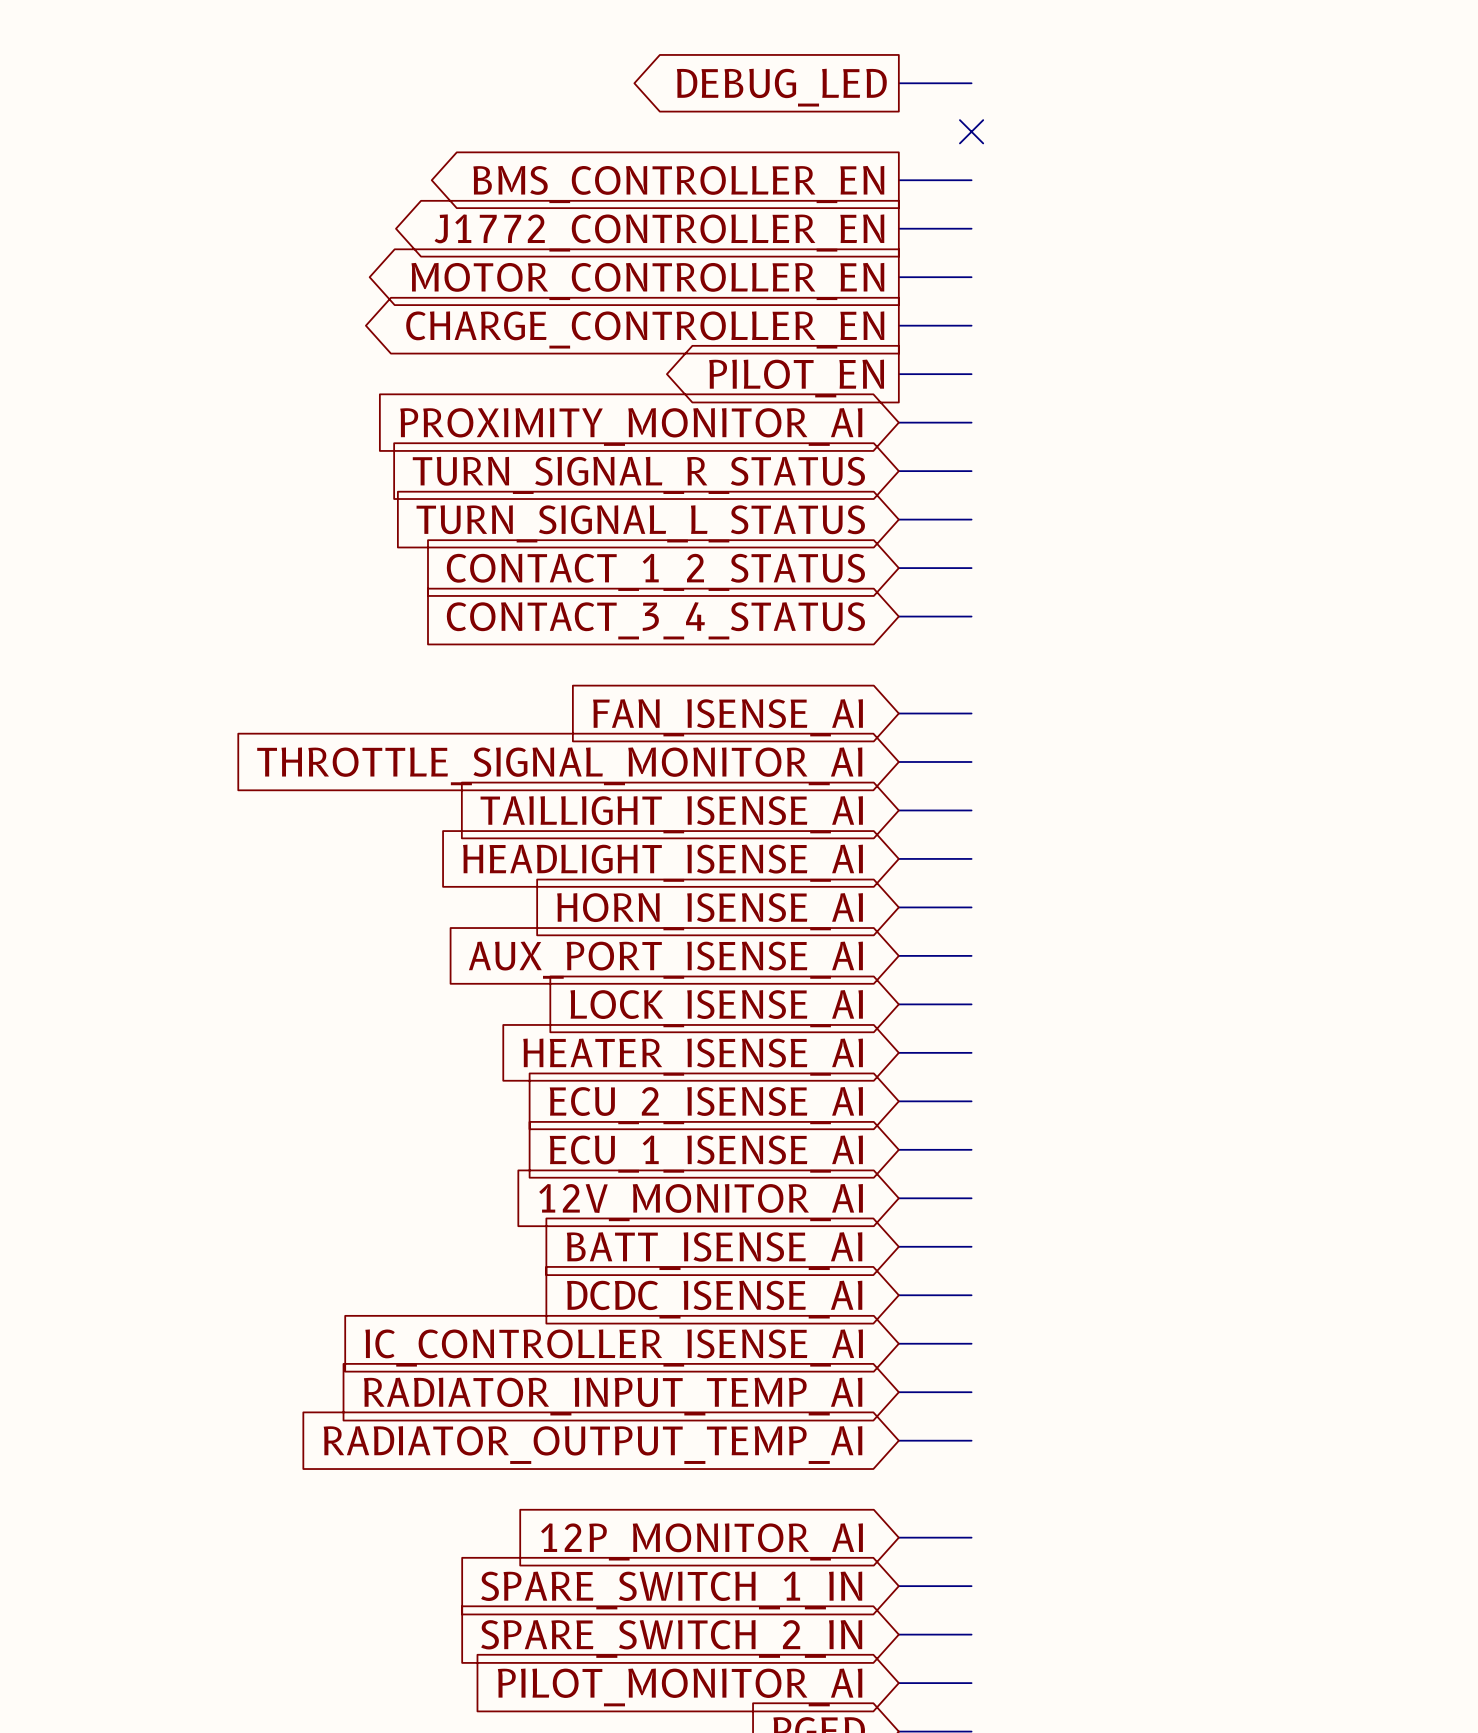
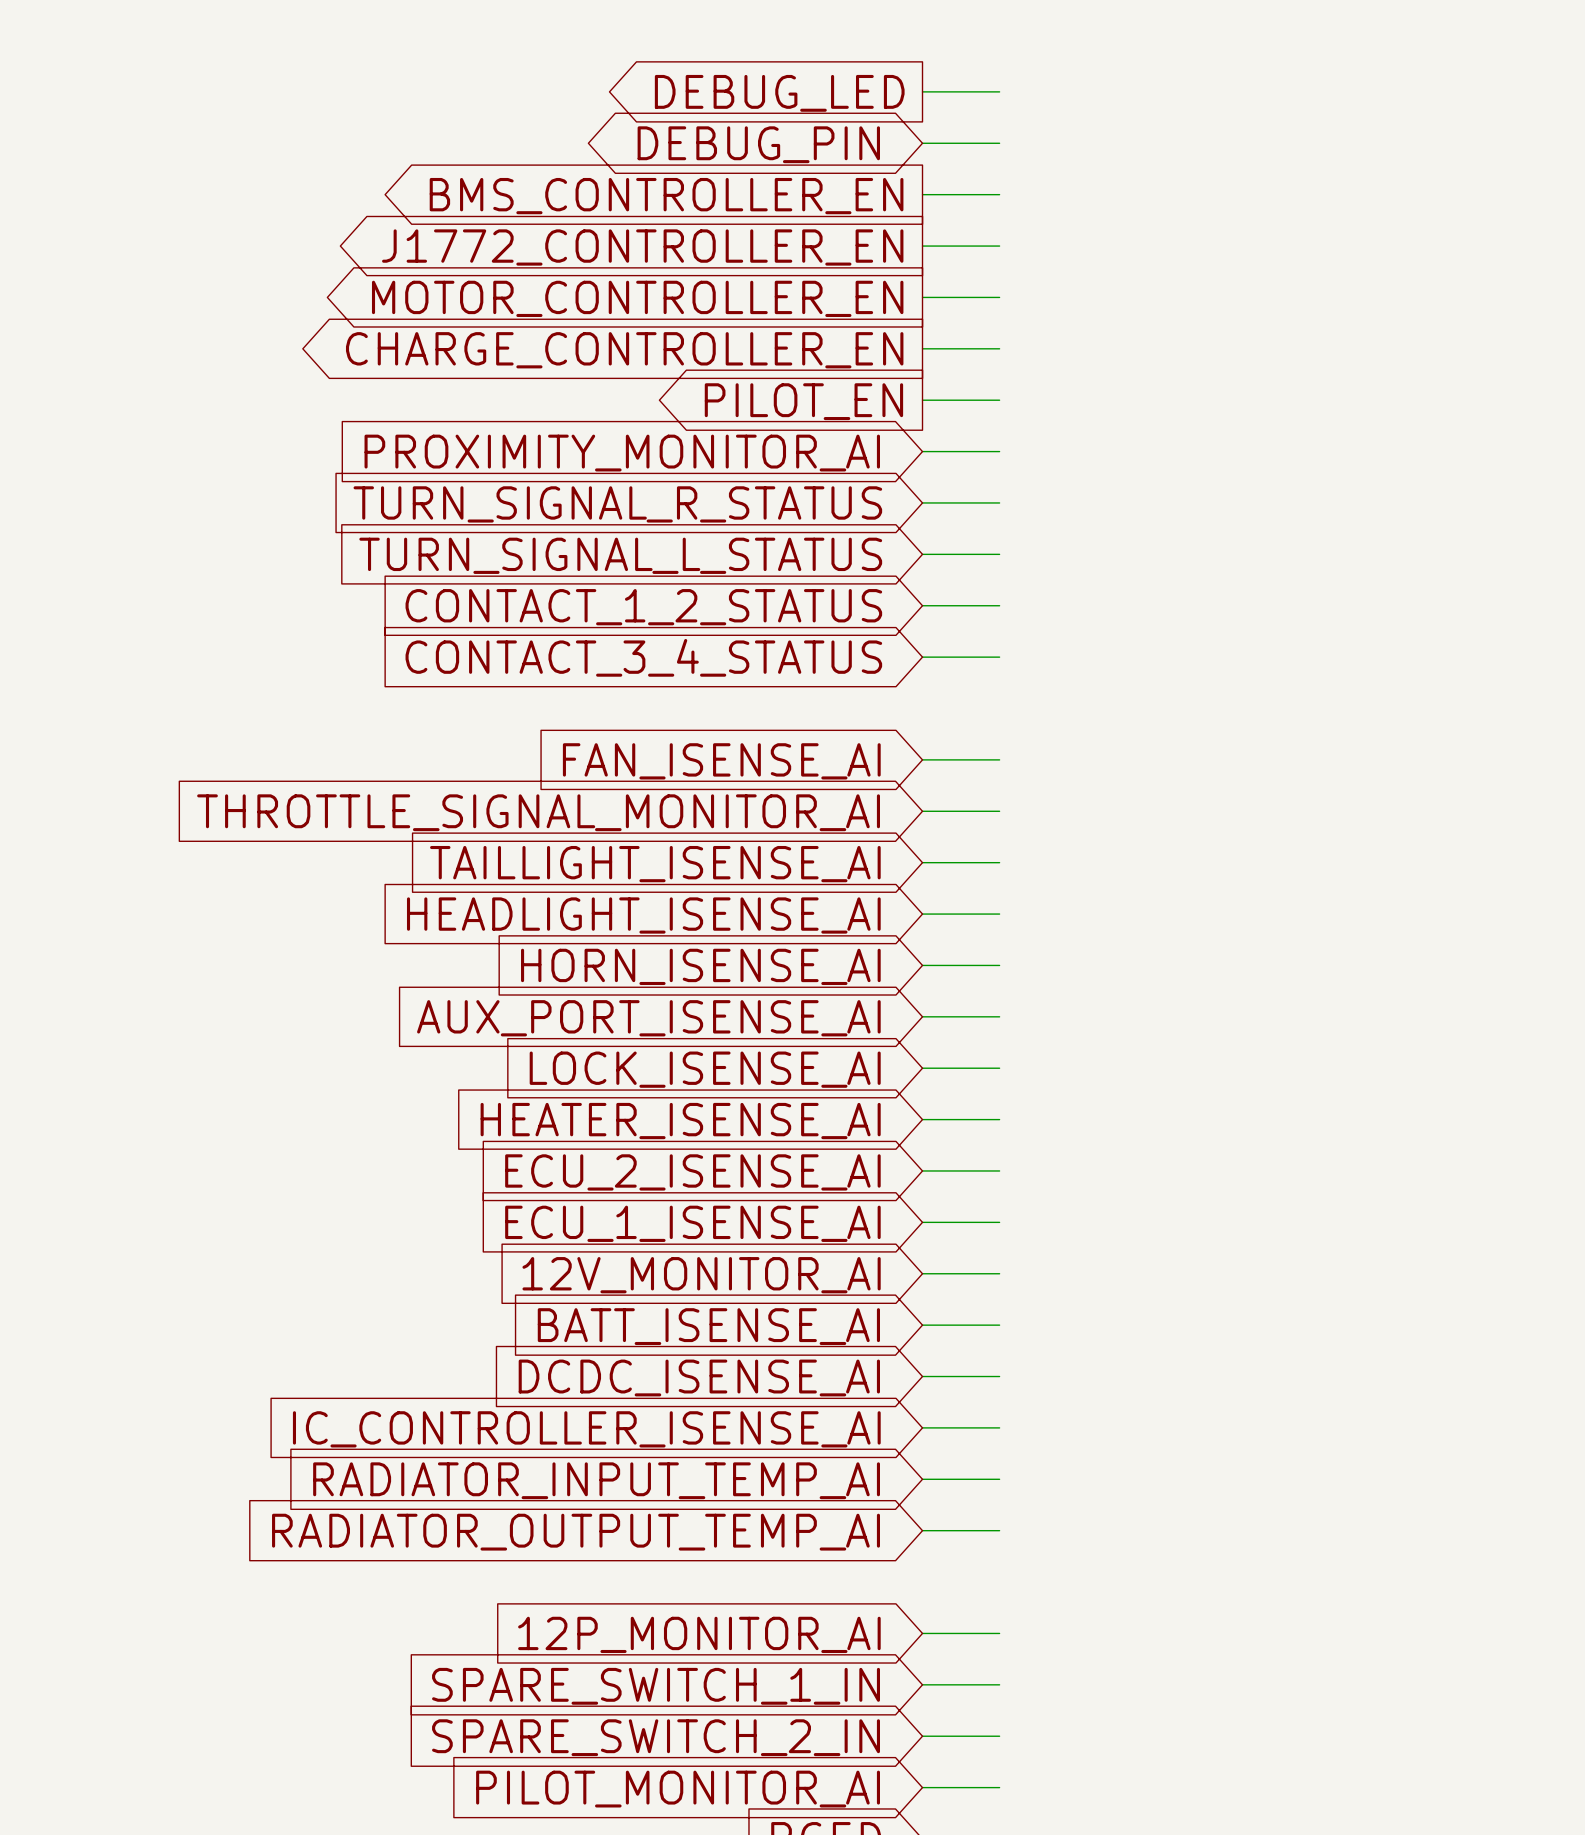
wire: none -> (922, 143) (999, 143)
no-connect mark: (971, 131) -> none
global label: none -> DEBUG_PIN (758, 144)

